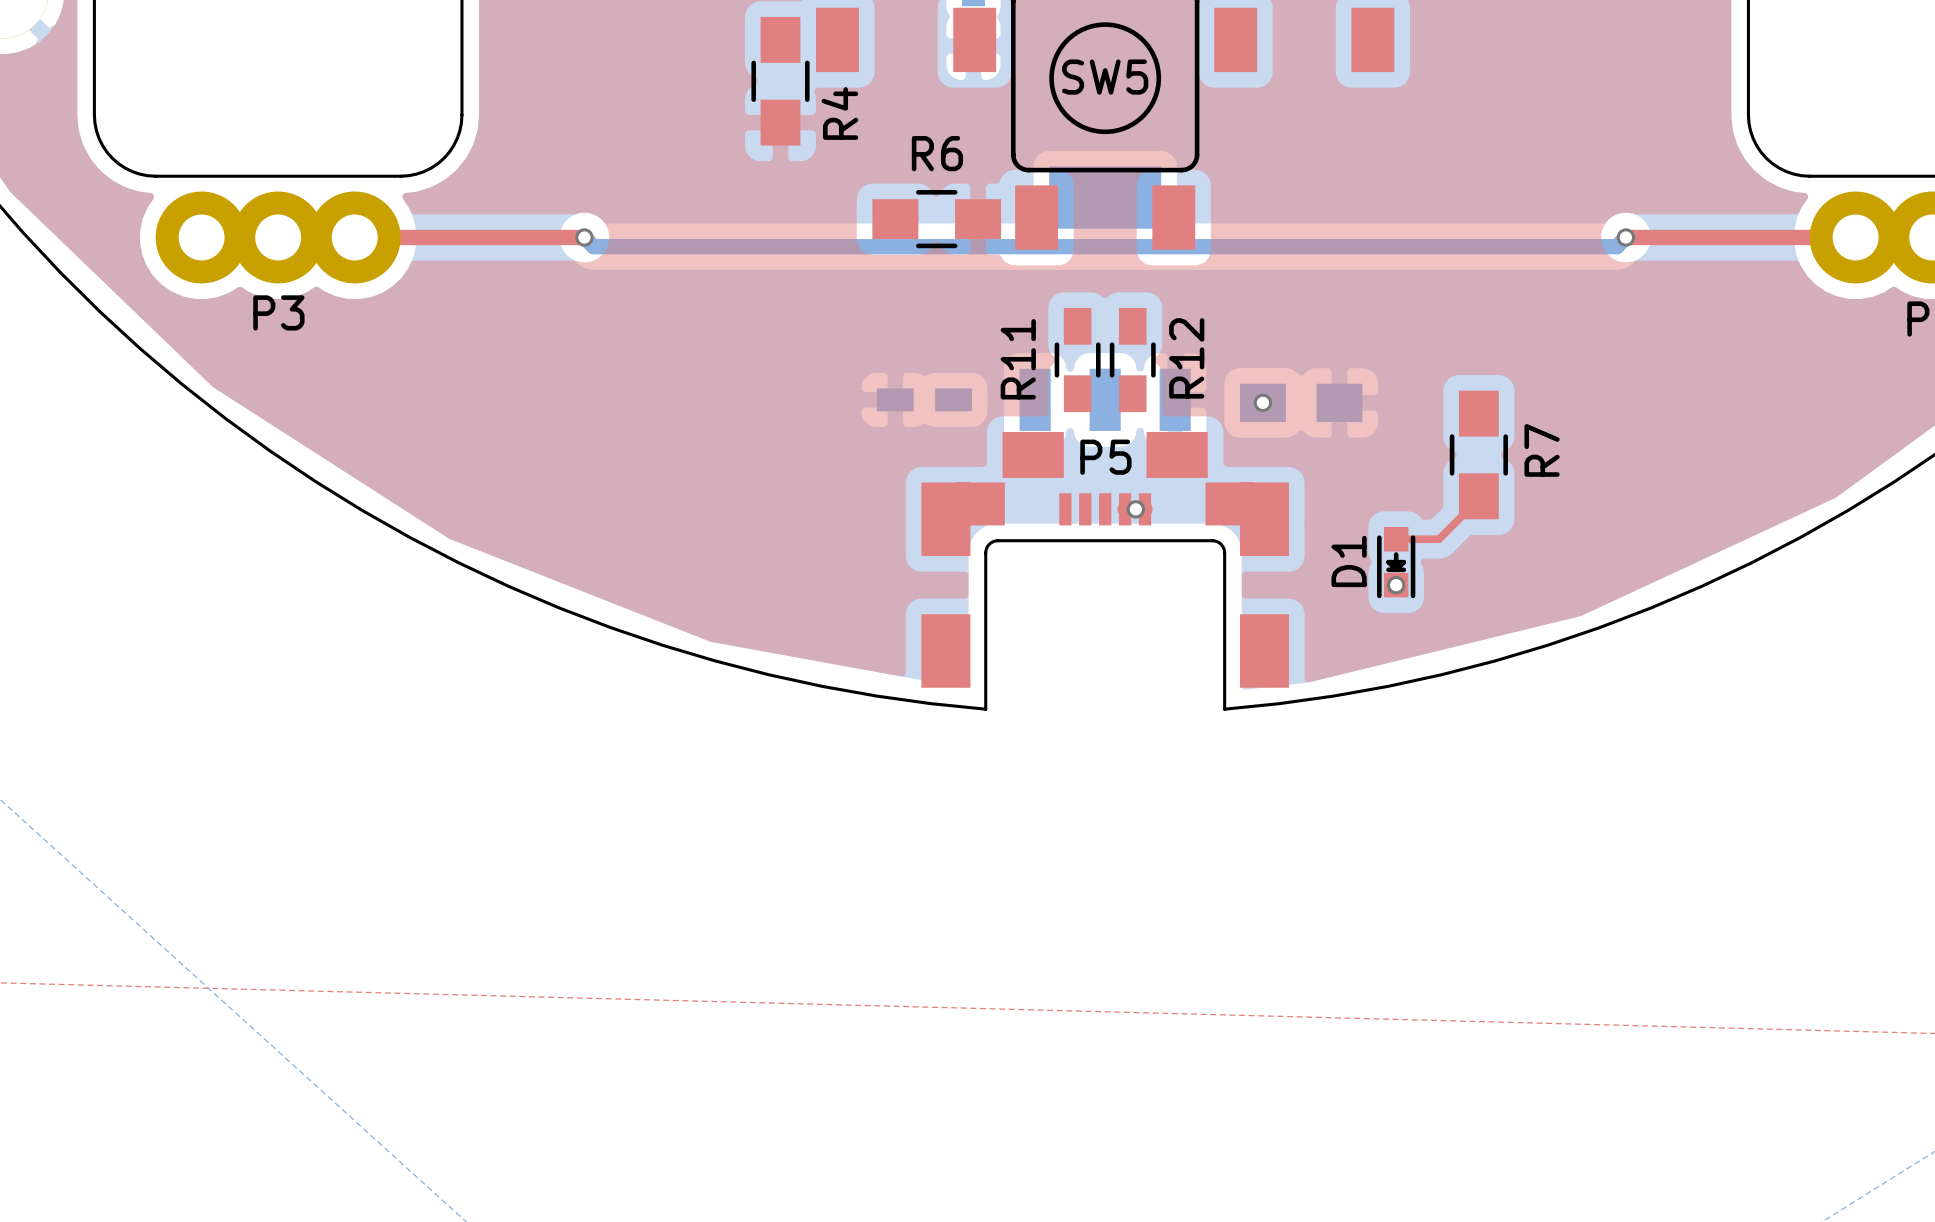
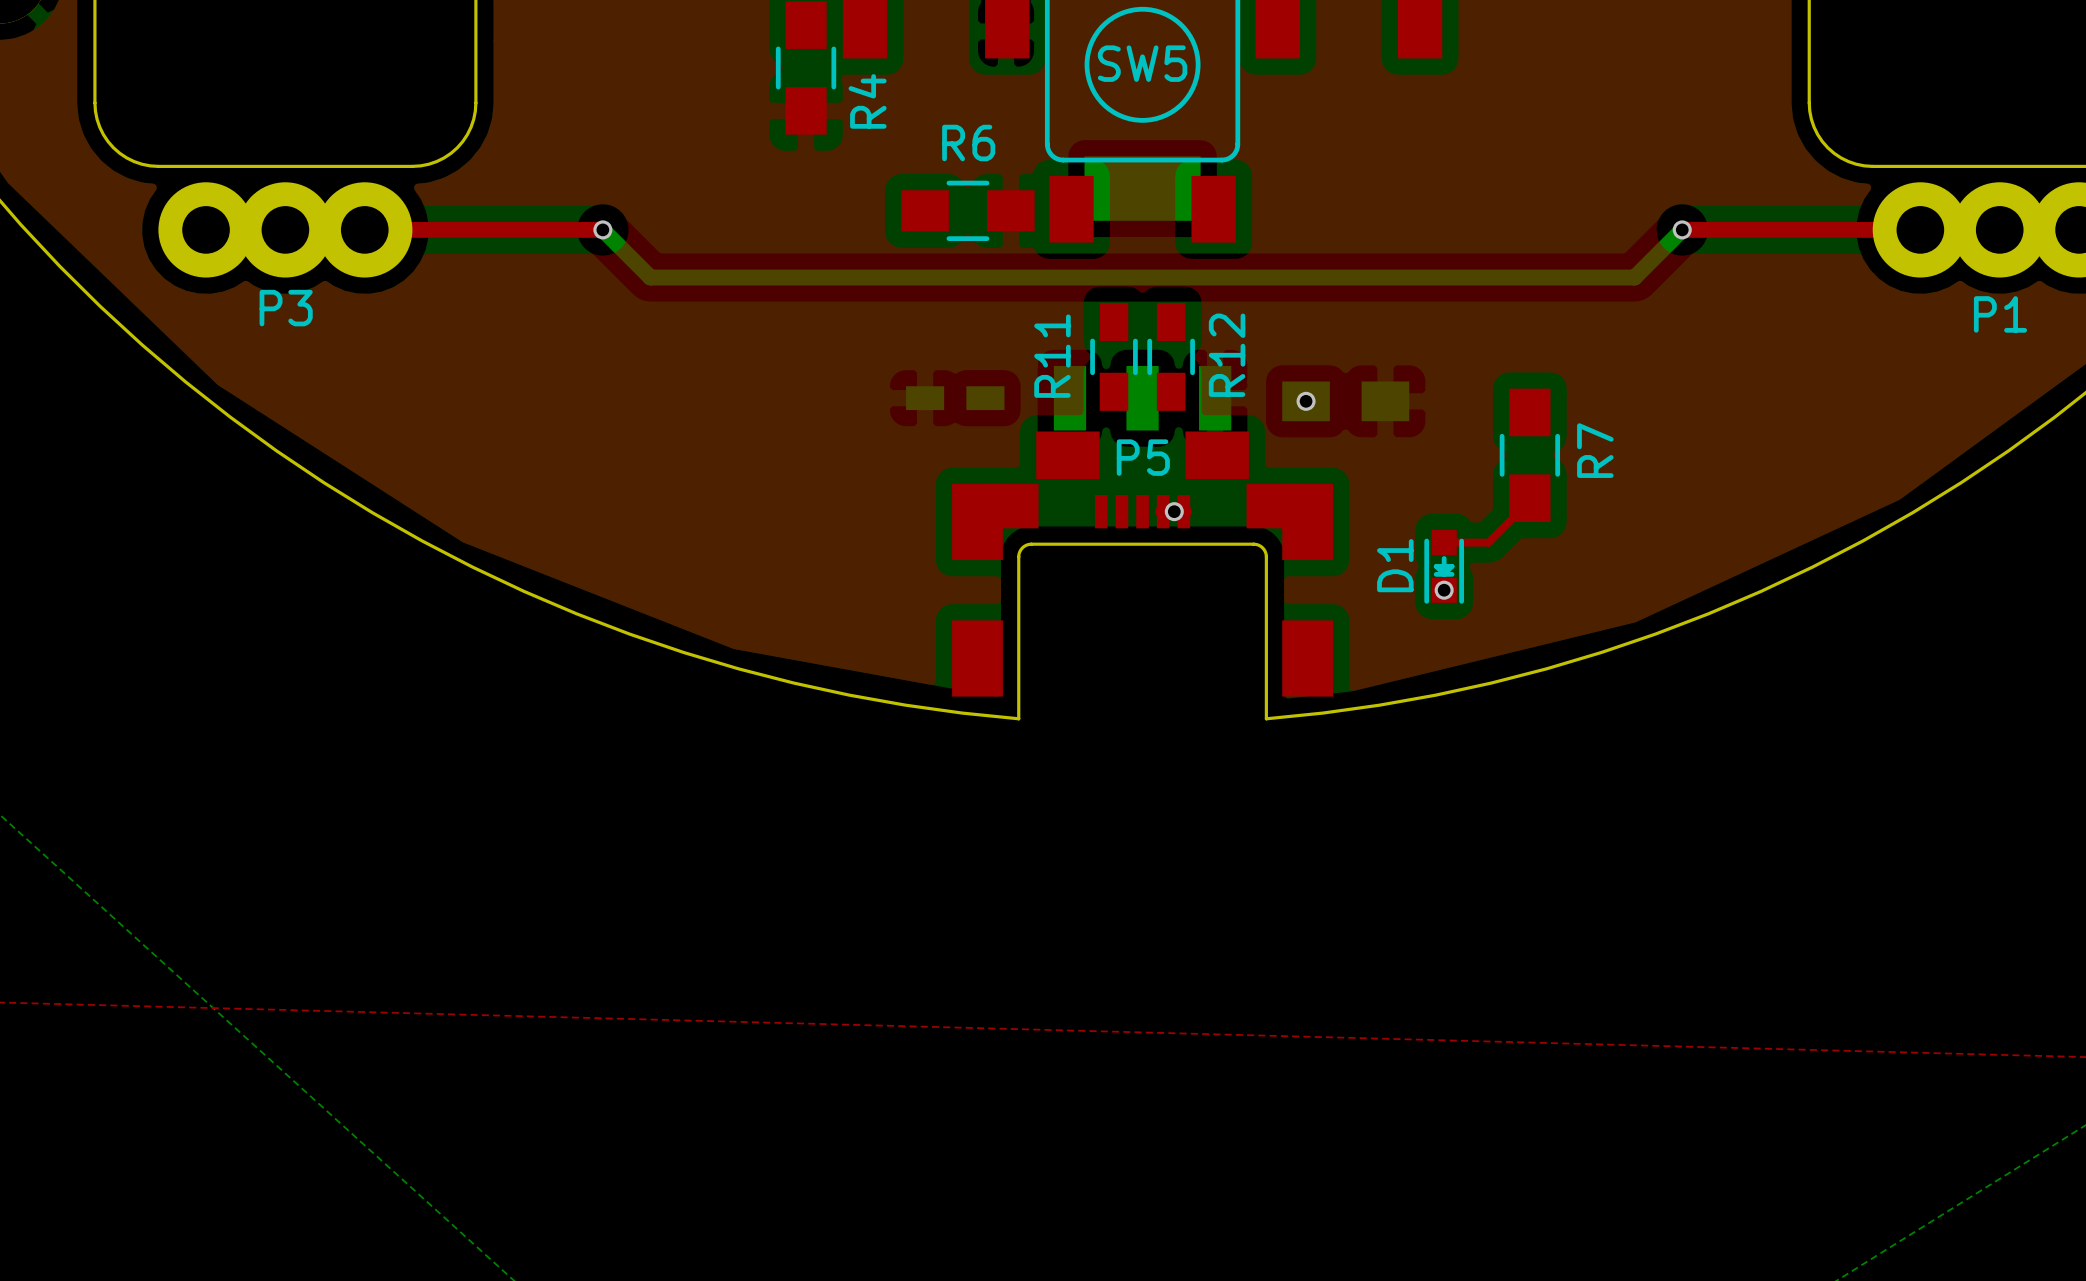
bottom track: (593, 246) (1616, 246) -> (612, 239) (650, 277) (1634, 277) (1672, 239)

